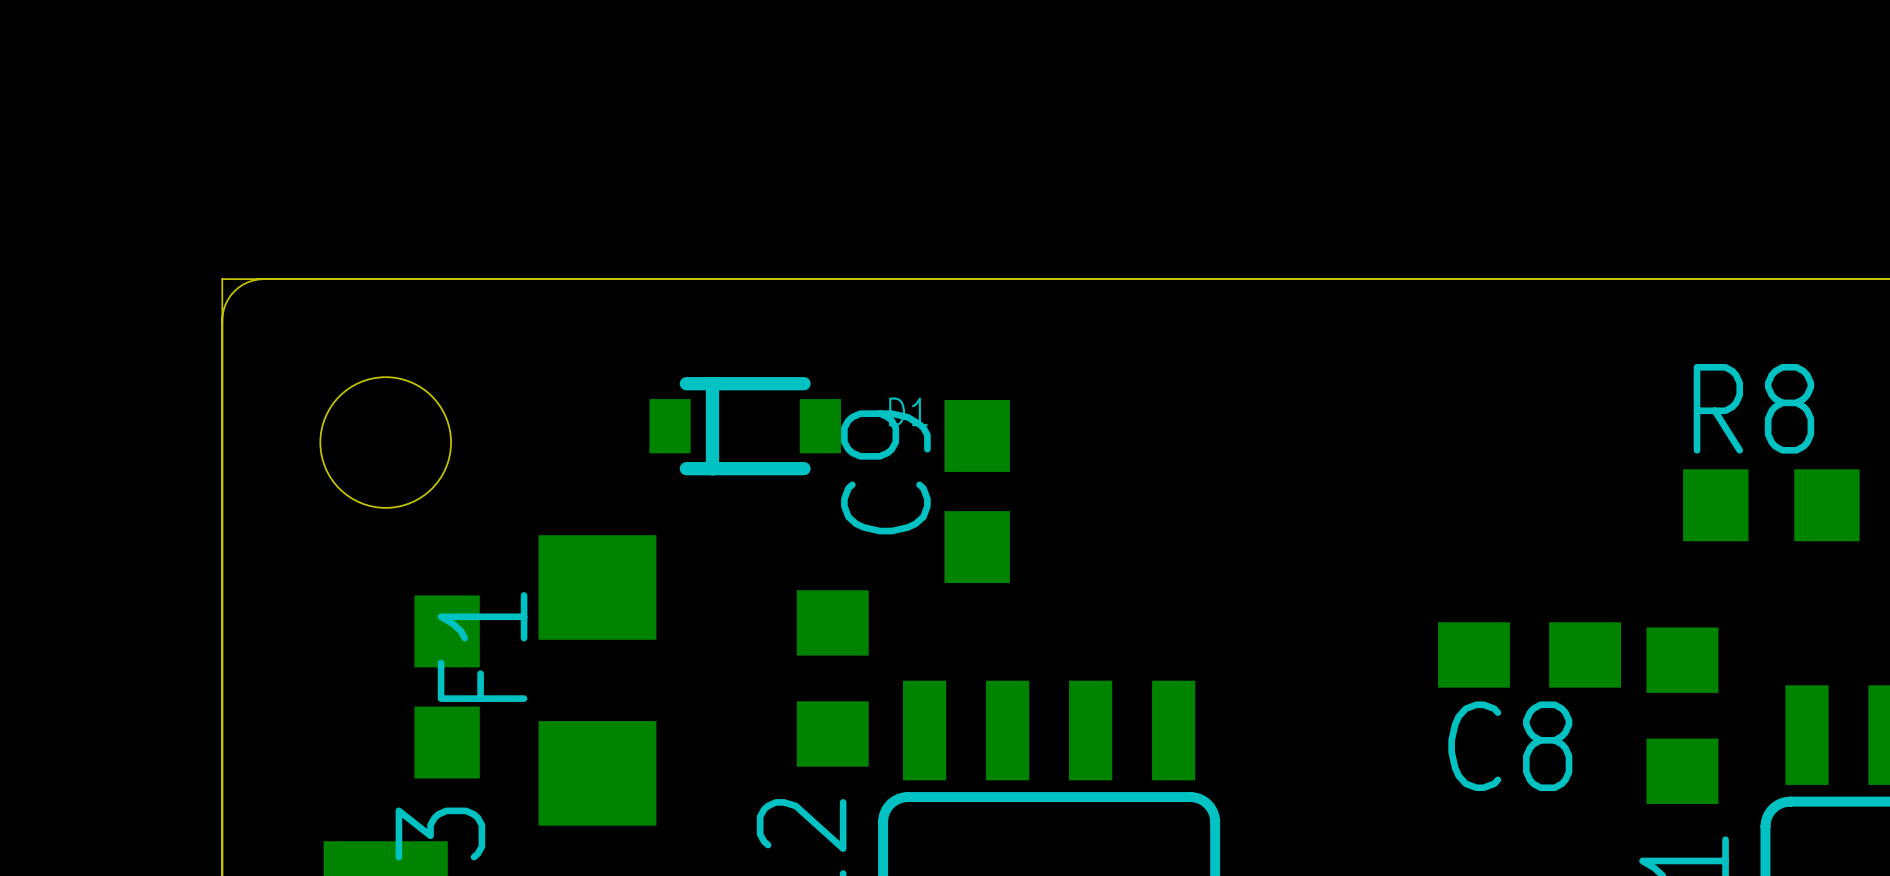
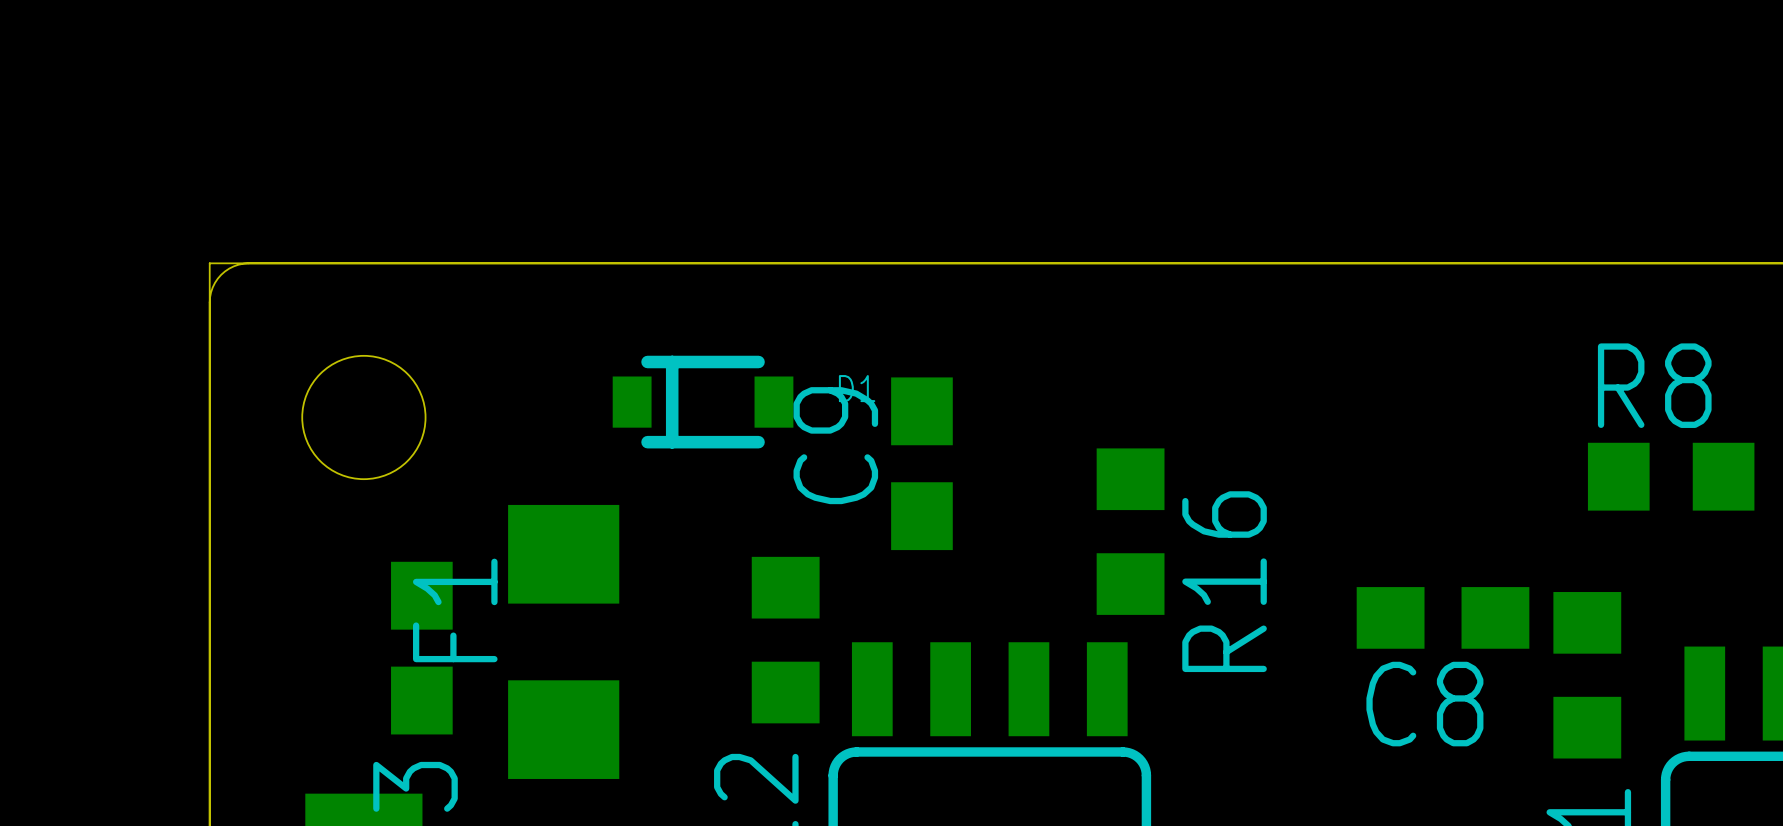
R16: none -> (1130, 531)

